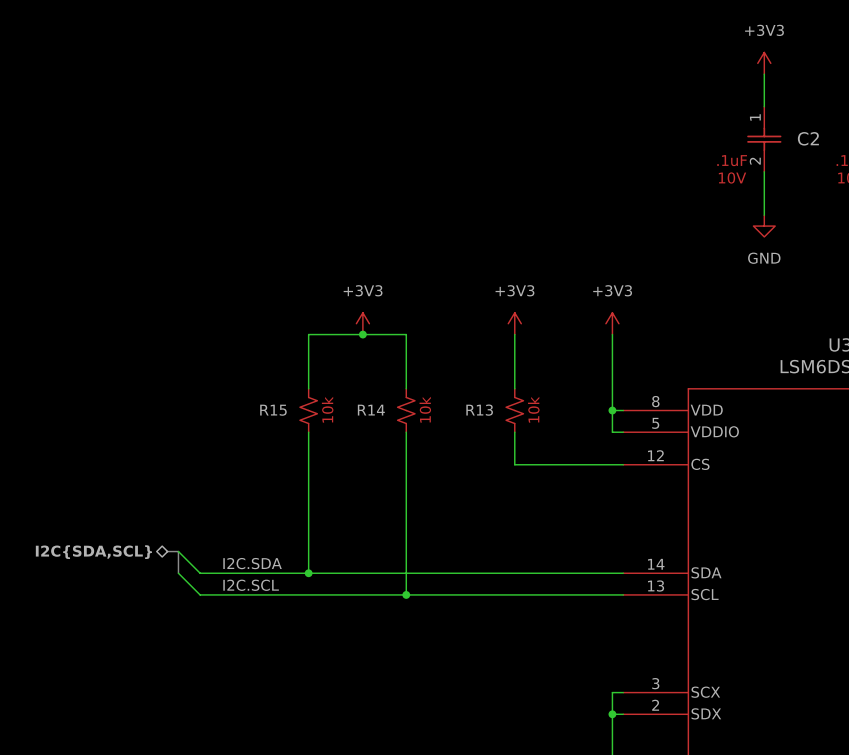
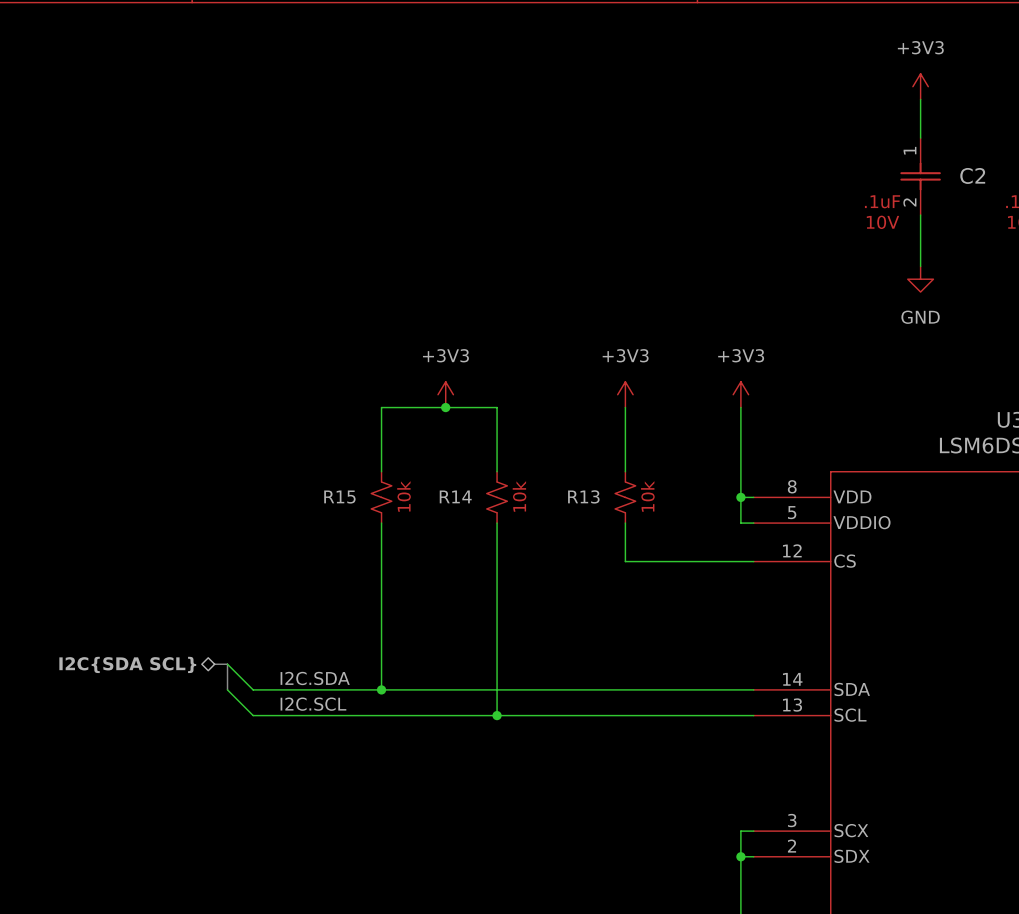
hierarchical label: I2C{SDA,SCL} (93, 552) -> I2C{SDA SCL} (127, 664)

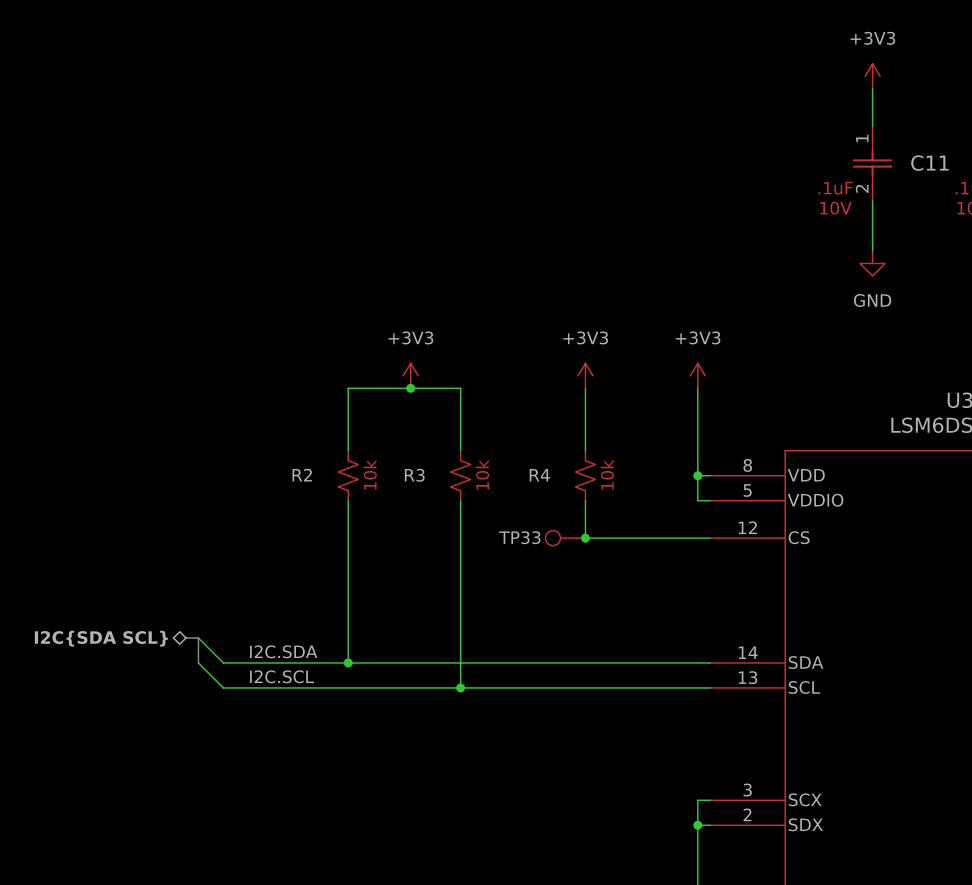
C2 name: C2 (972, 175) -> C11 (929, 163)
R14 name: R14 (455, 496) -> R3 (414, 475)
R13 name: R13 (583, 496) -> R4 (539, 475)
R15 name: R15 (339, 497) -> R2 (302, 475)
TP33: none -> (565, 538)
junction: none -> (585, 538)

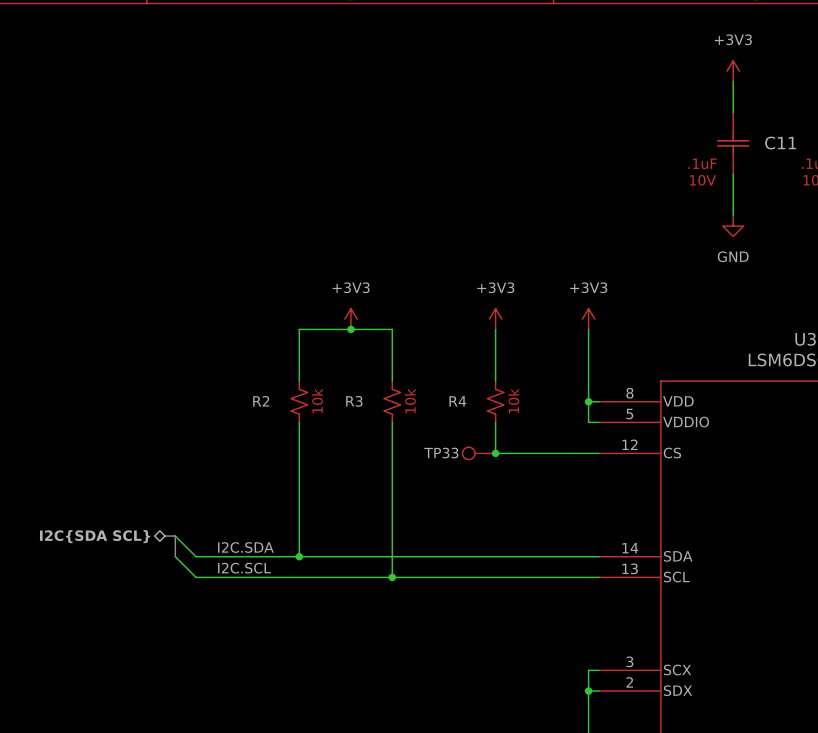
C11 pin number: 1 (862, 138) -> none
C11 pin number: 2 (862, 188) -> none

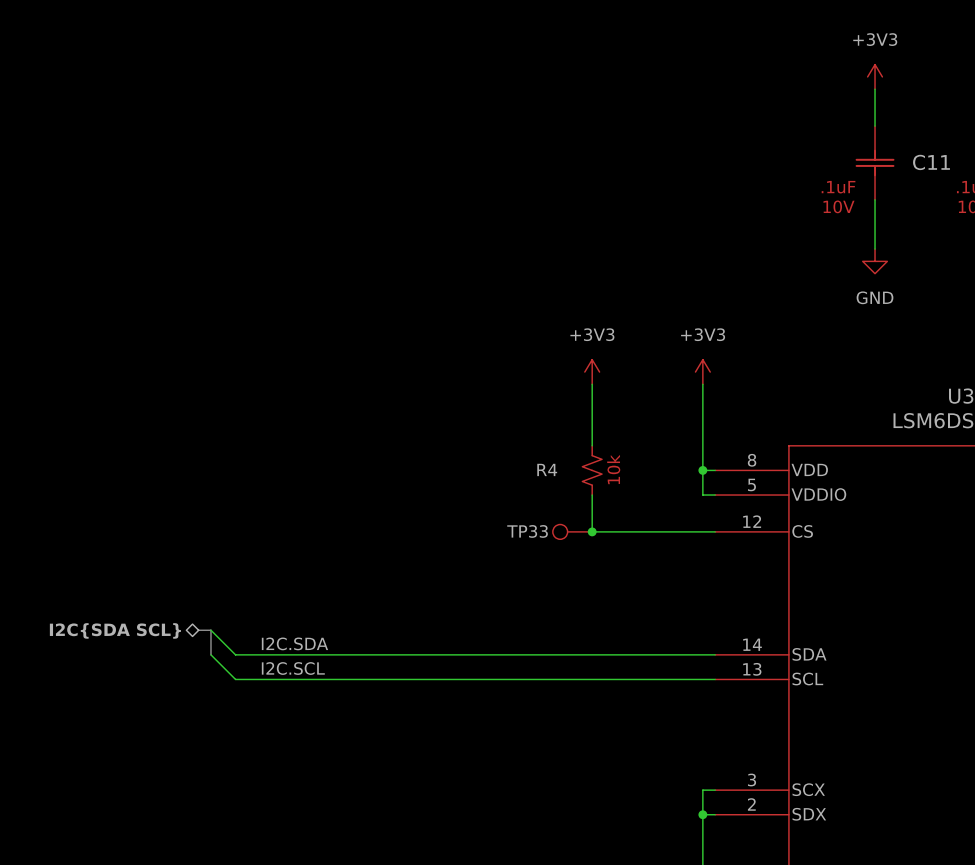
power symbol: +3V3 (350, 319) -> none
junction: (350, 329) -> none
wire: (299, 381) (299, 329) (392, 329) (392, 381) -> none
R2: (299, 401) -> none
R3: (392, 401) -> none
wire: (299, 422) (299, 556) -> none
wire: (392, 422) (392, 577) -> none
junction: (299, 556) -> none
junction: (392, 577) -> none

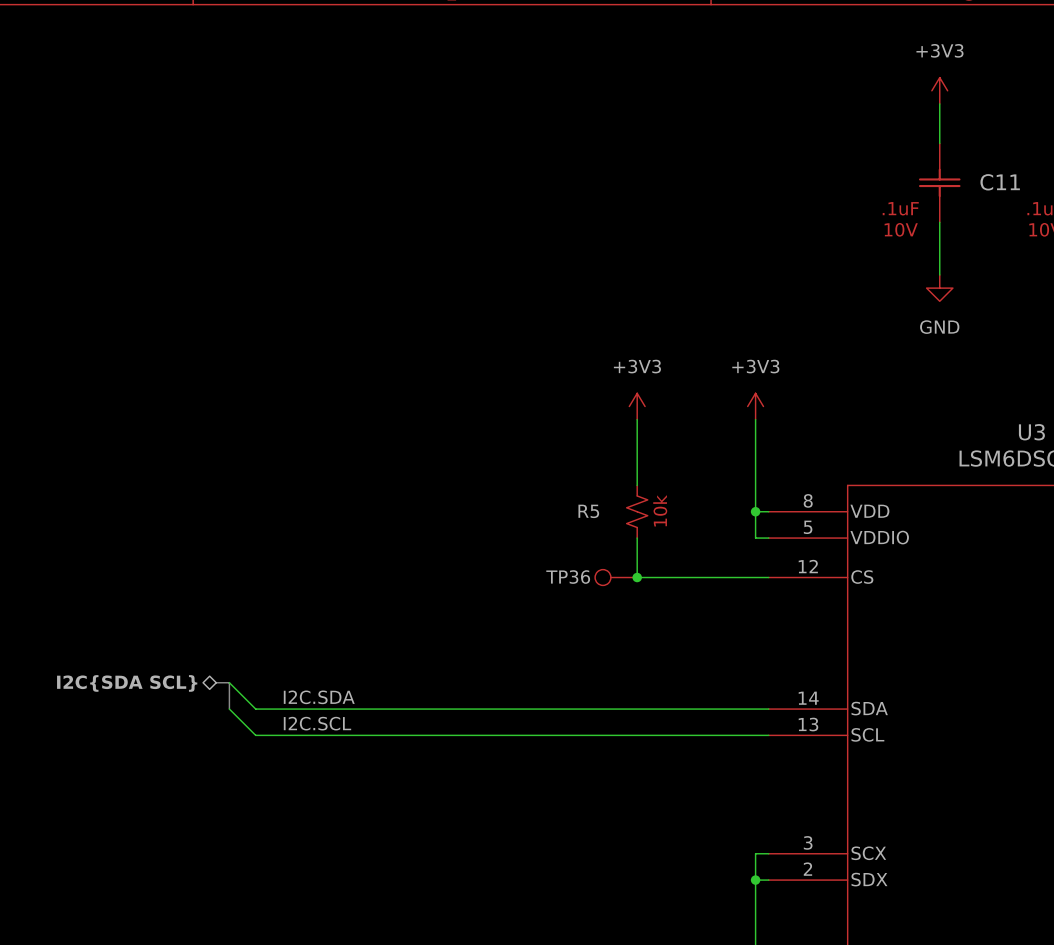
R4 name: R4 (547, 469) -> R5 (588, 511)
TP33 name: TP33 (527, 531) -> TP36 (568, 577)

